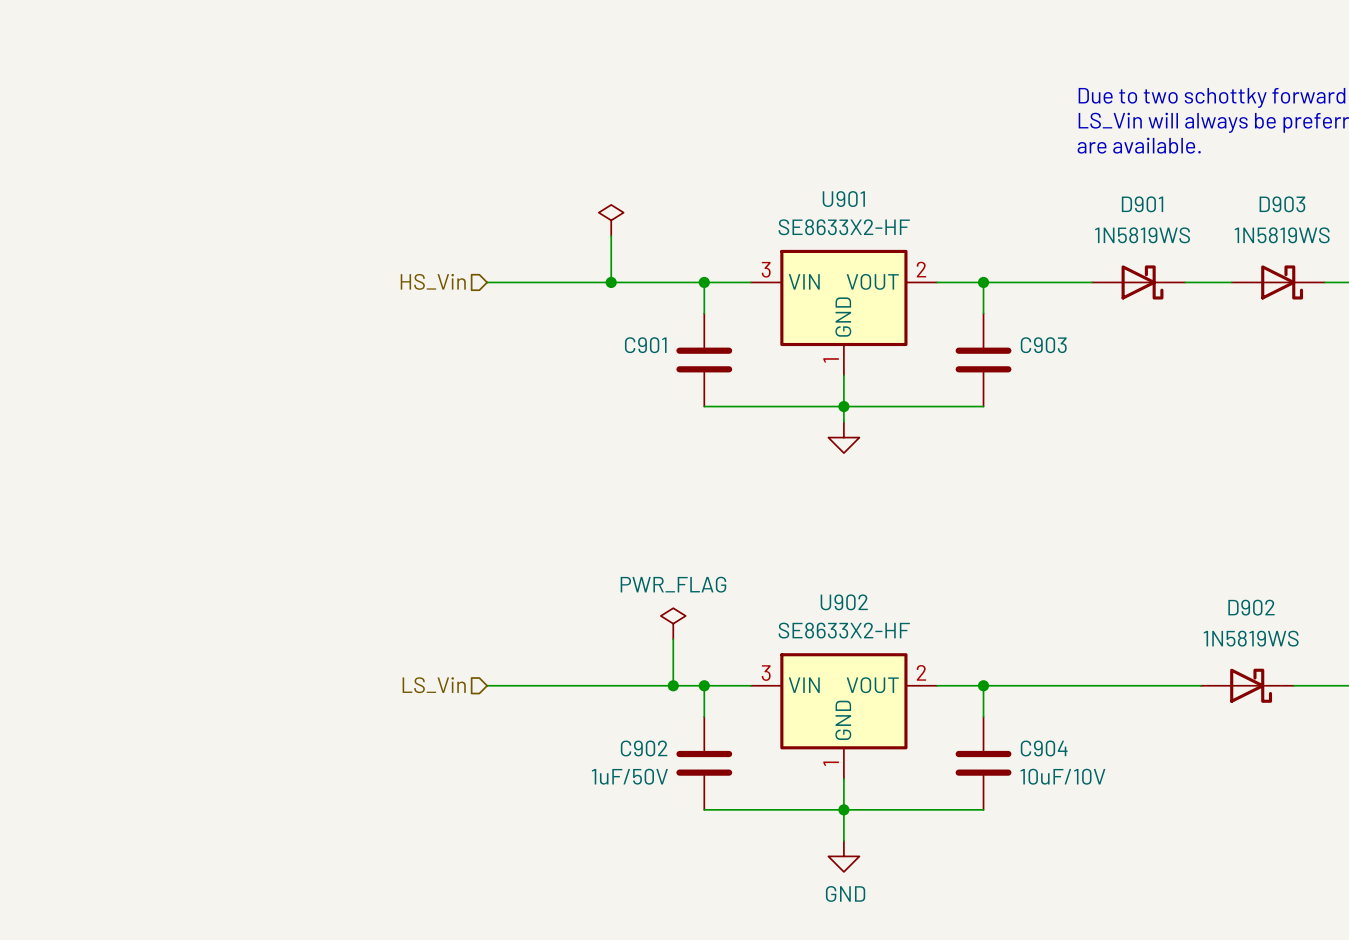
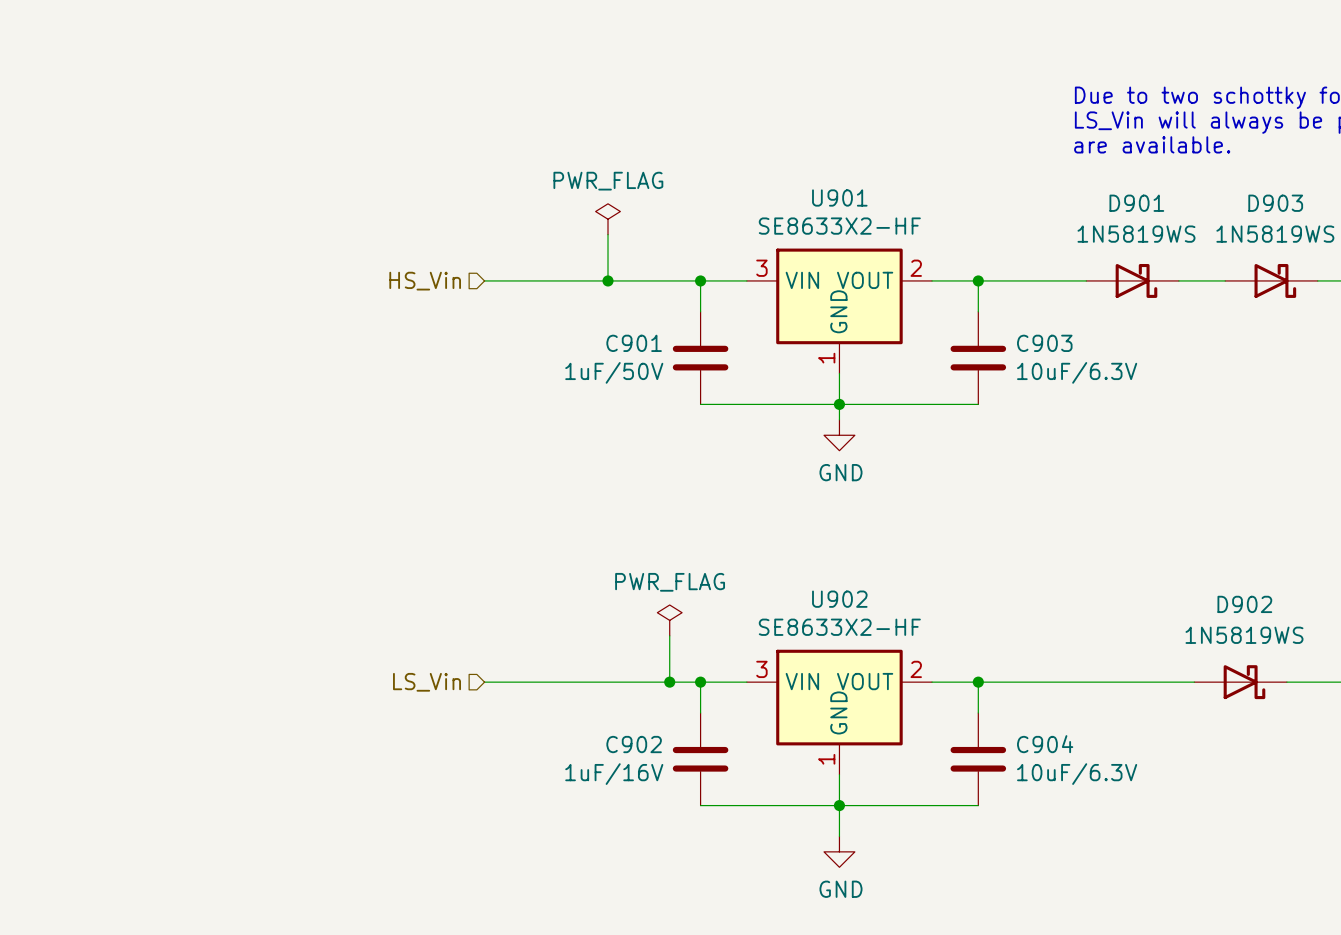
power symbol text: none -> PWR_FLAG (608, 181)
C901 value: none -> 1uF/50V (614, 372)
C903 value: none -> 10uF/6.3V (1077, 372)
power symbol text: none -> GND (840, 472)
C902 value: 1uF/50V (629, 776) -> 1uF/16V (614, 774)
C904 value: 10uF/10V (1062, 776) -> 10uF/6.3V (1077, 774)

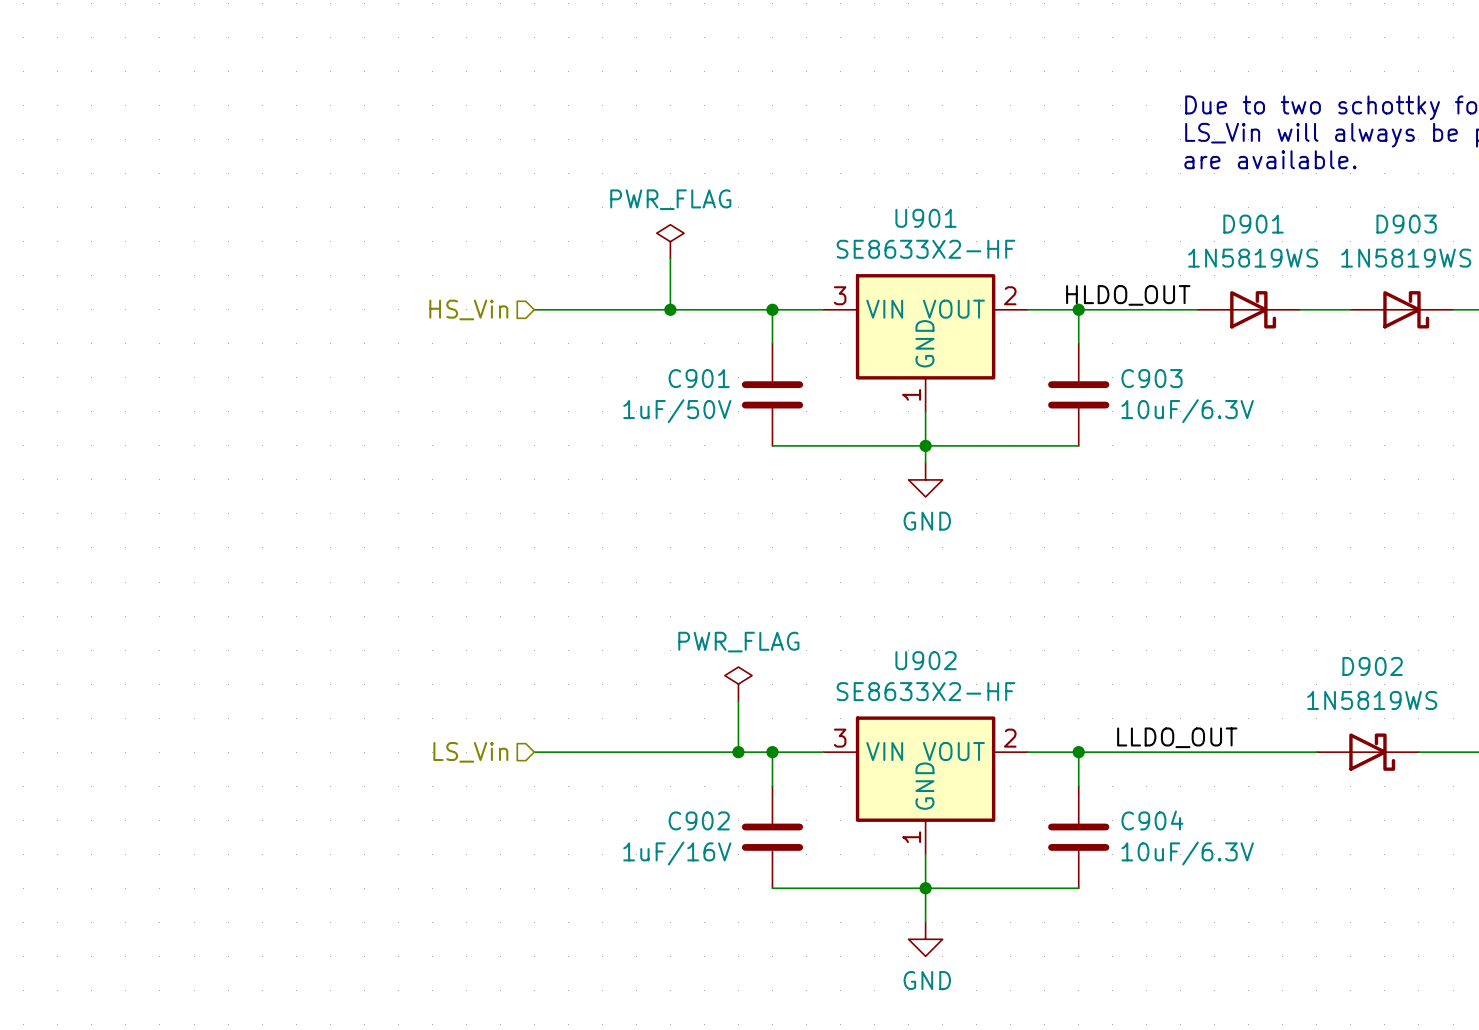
label: none -> HLDO_OUT (1128, 295)
label: none -> LLDO_OUT (1177, 737)

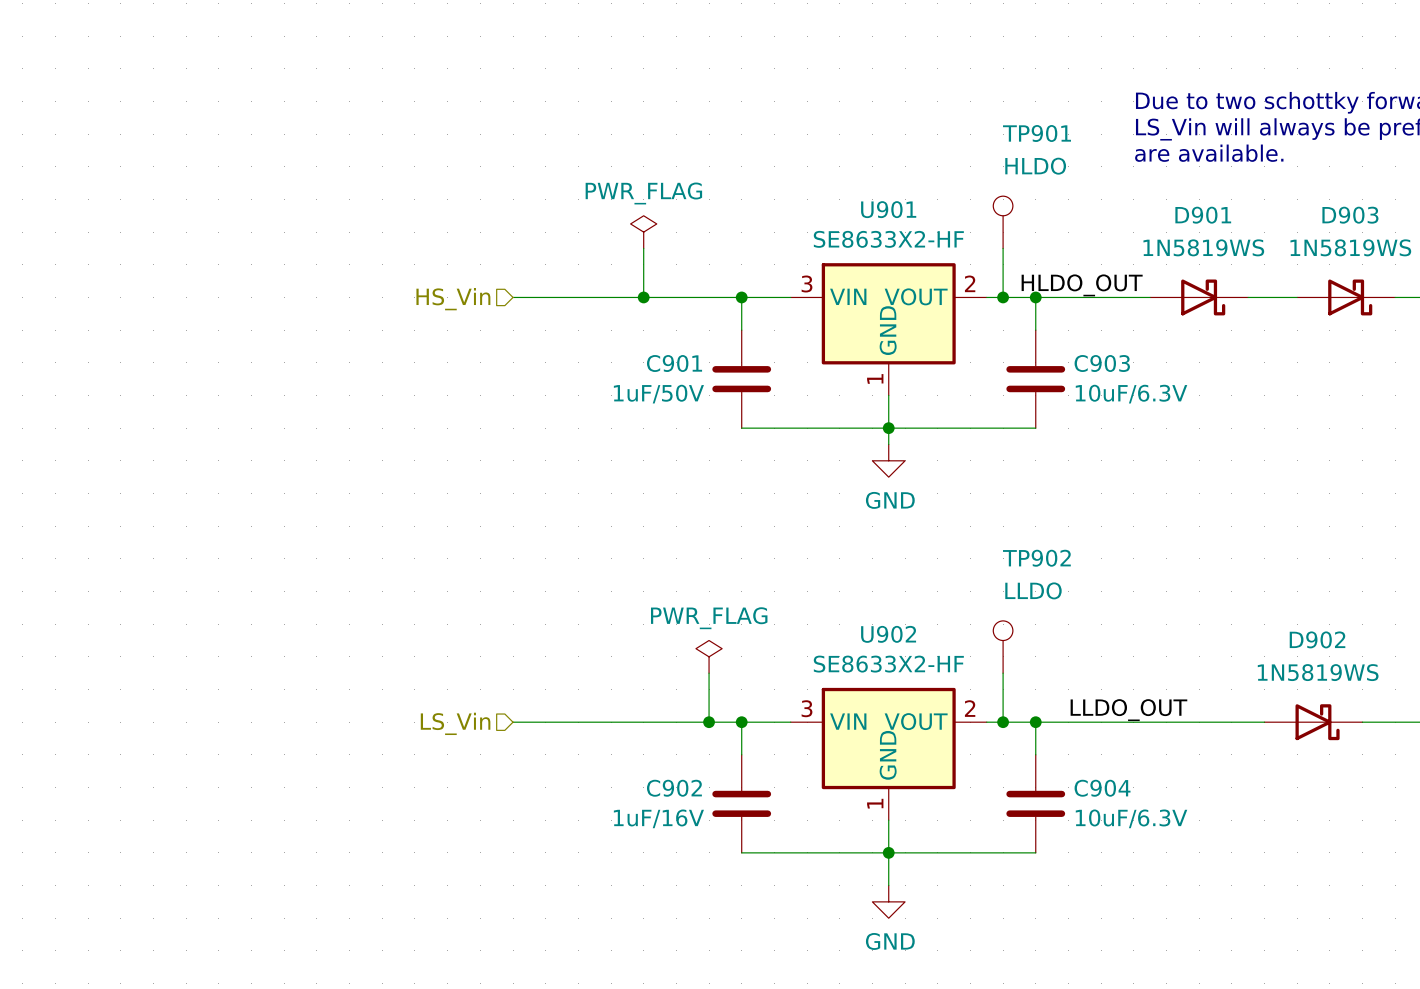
TP901: none -> HLDO (1003, 222)
wire: none -> (1003, 248) (1003, 297)
junction: none -> (1003, 297)
TP902: none -> LLDO (1003, 647)
wire: none -> (1003, 673) (1003, 722)
junction: none -> (1003, 722)

